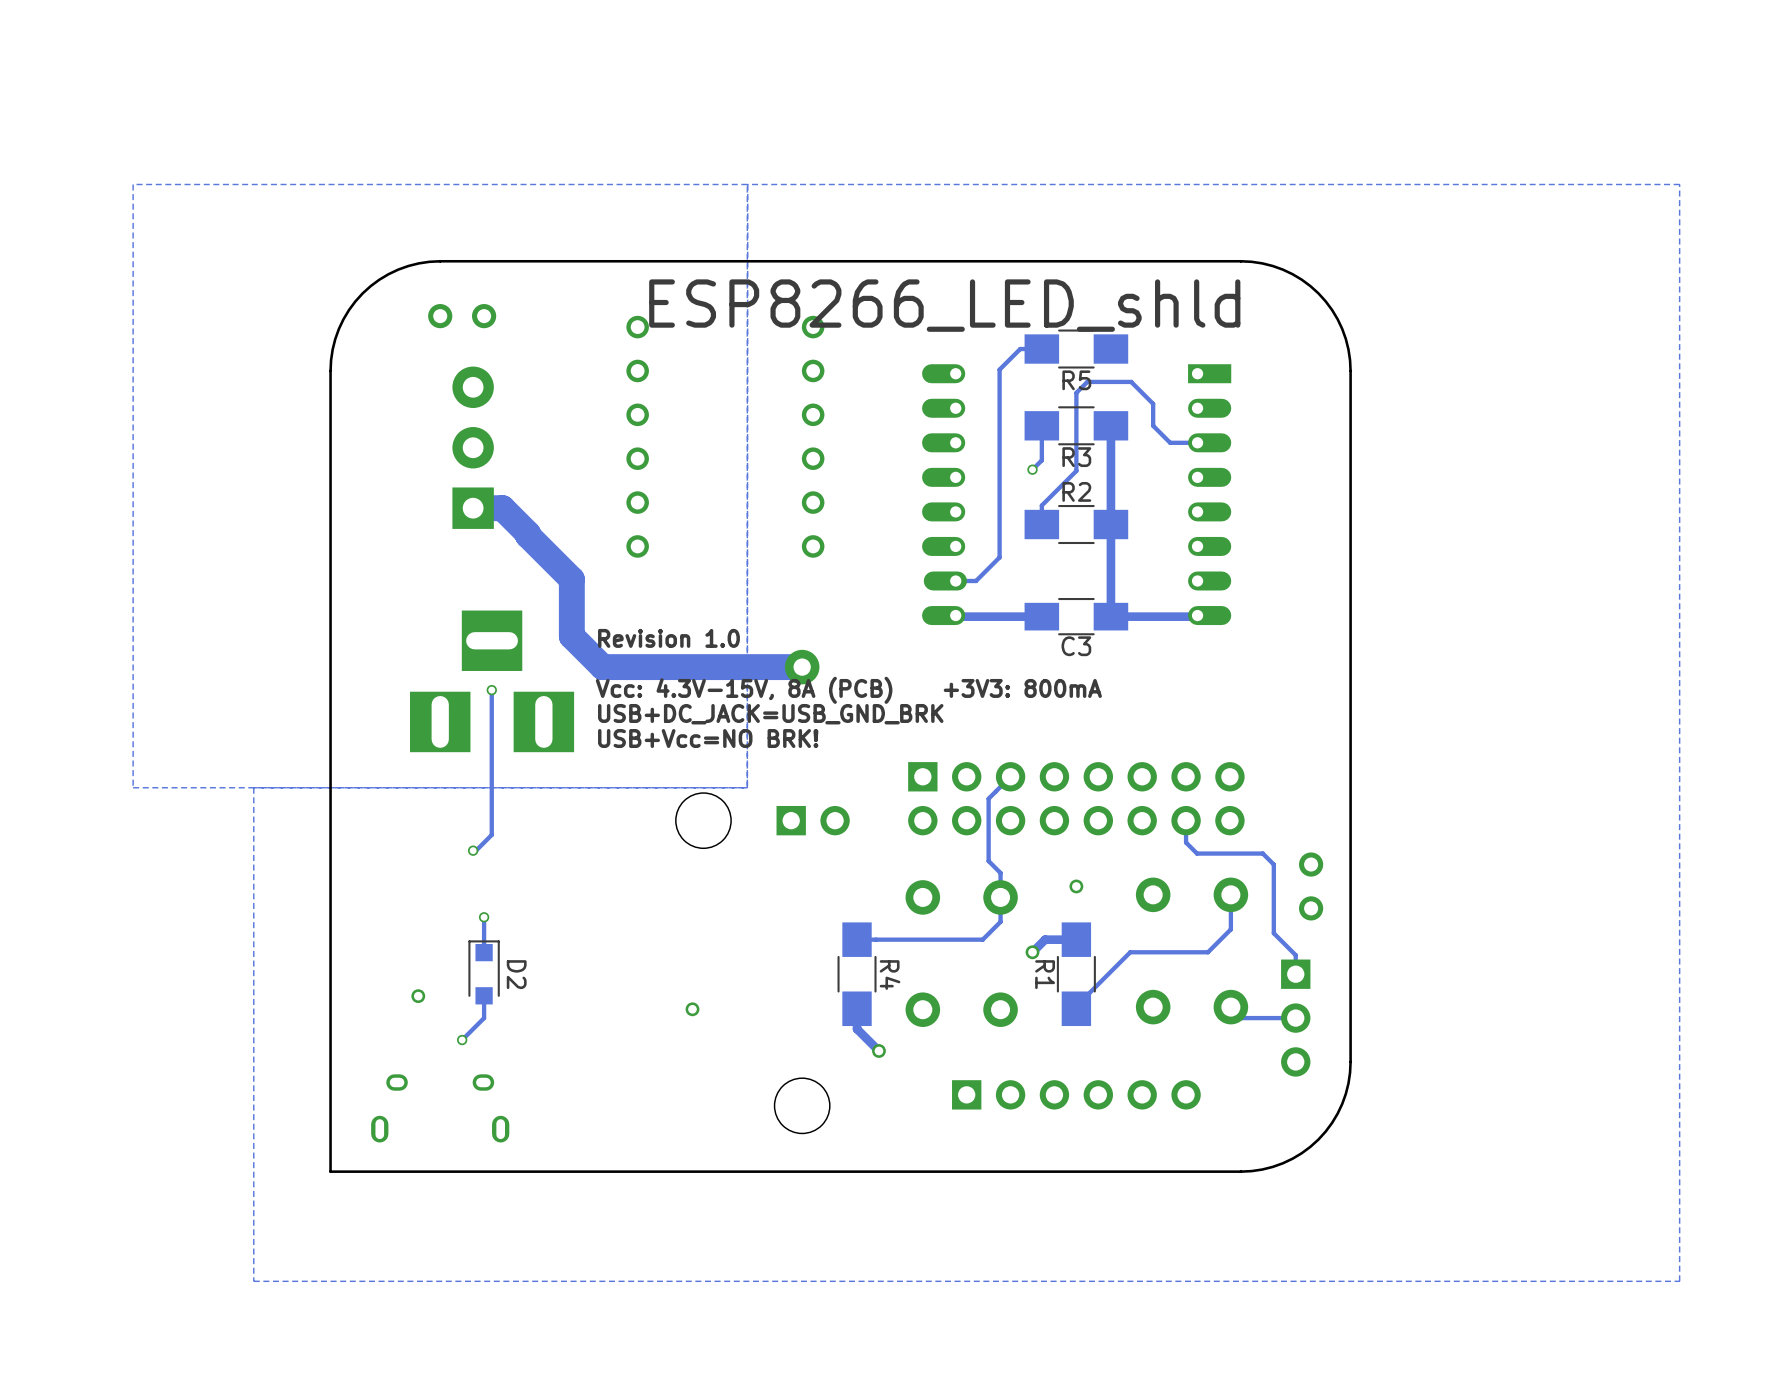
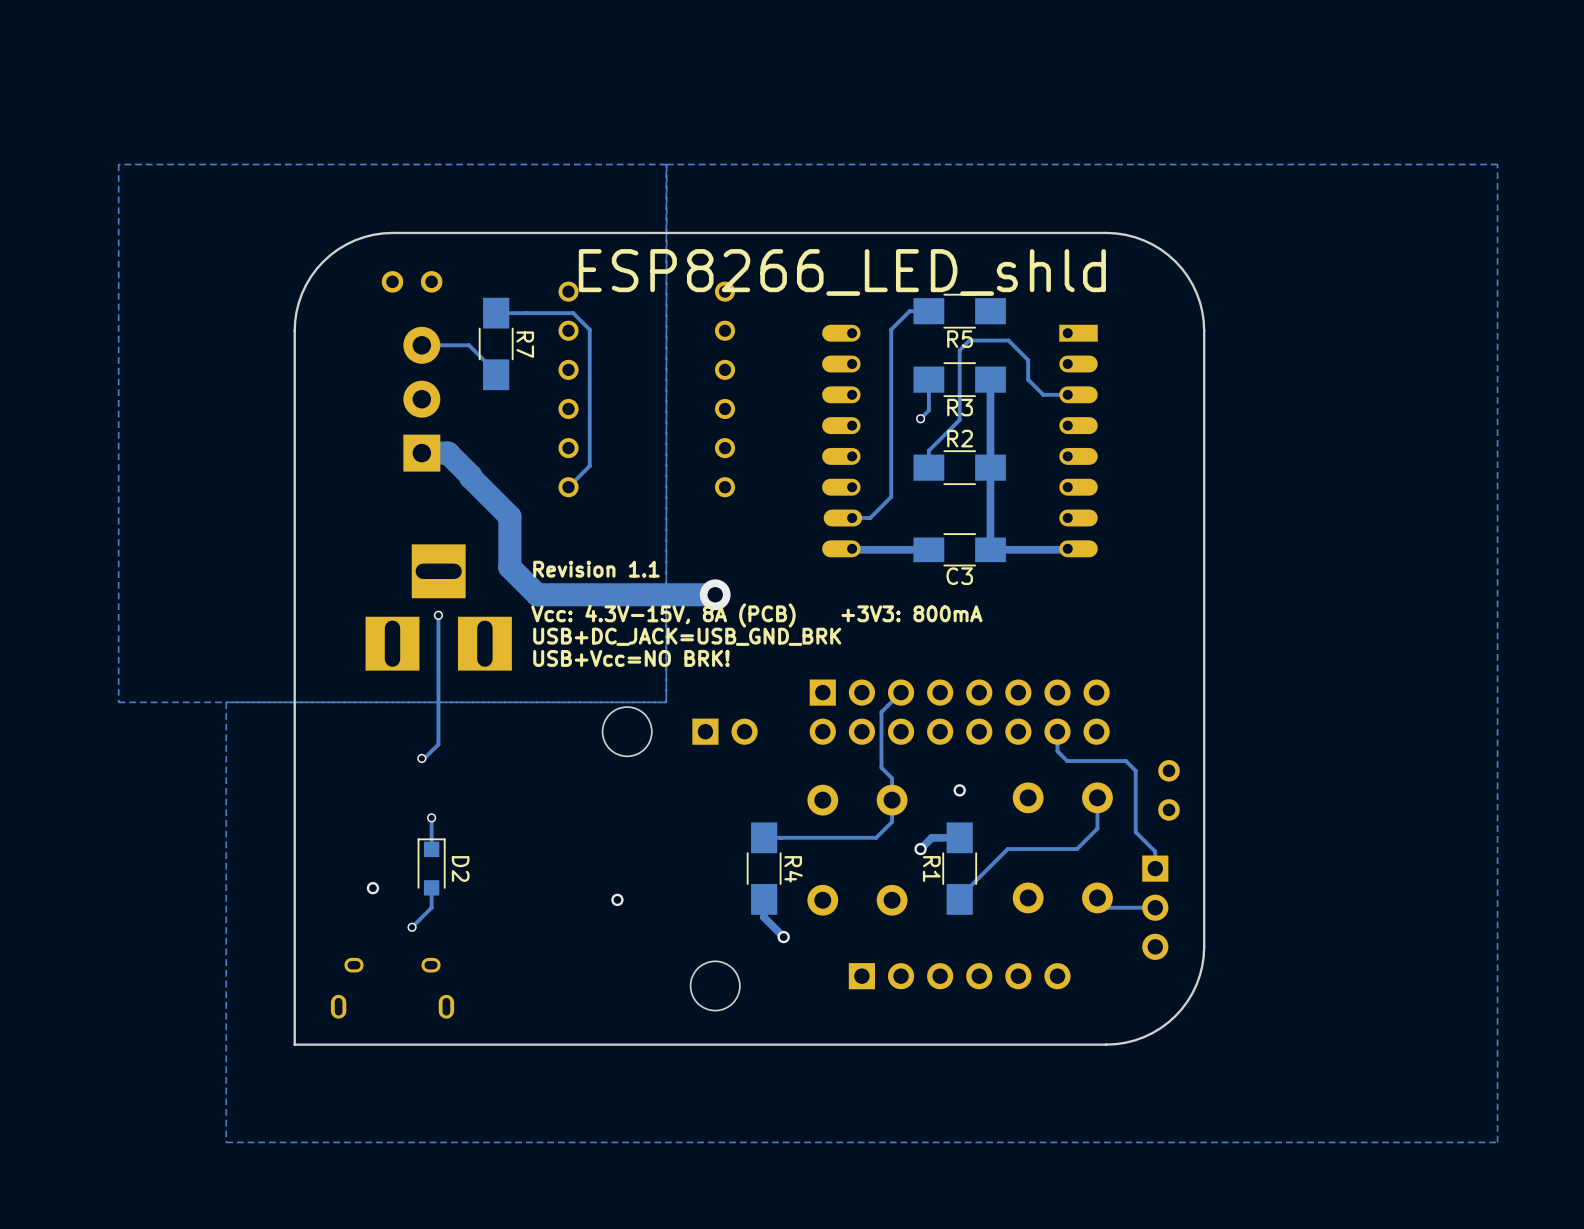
track: none -> (496, 313) (573, 313) (589, 329) (589, 465) (568, 487)
R7: none -> (496, 343)
track: none -> (421, 345) (469, 345) (496, 372) (496, 374)
text: Revision 1.0 (668, 638) -> Revision 1.1 (596, 569)

